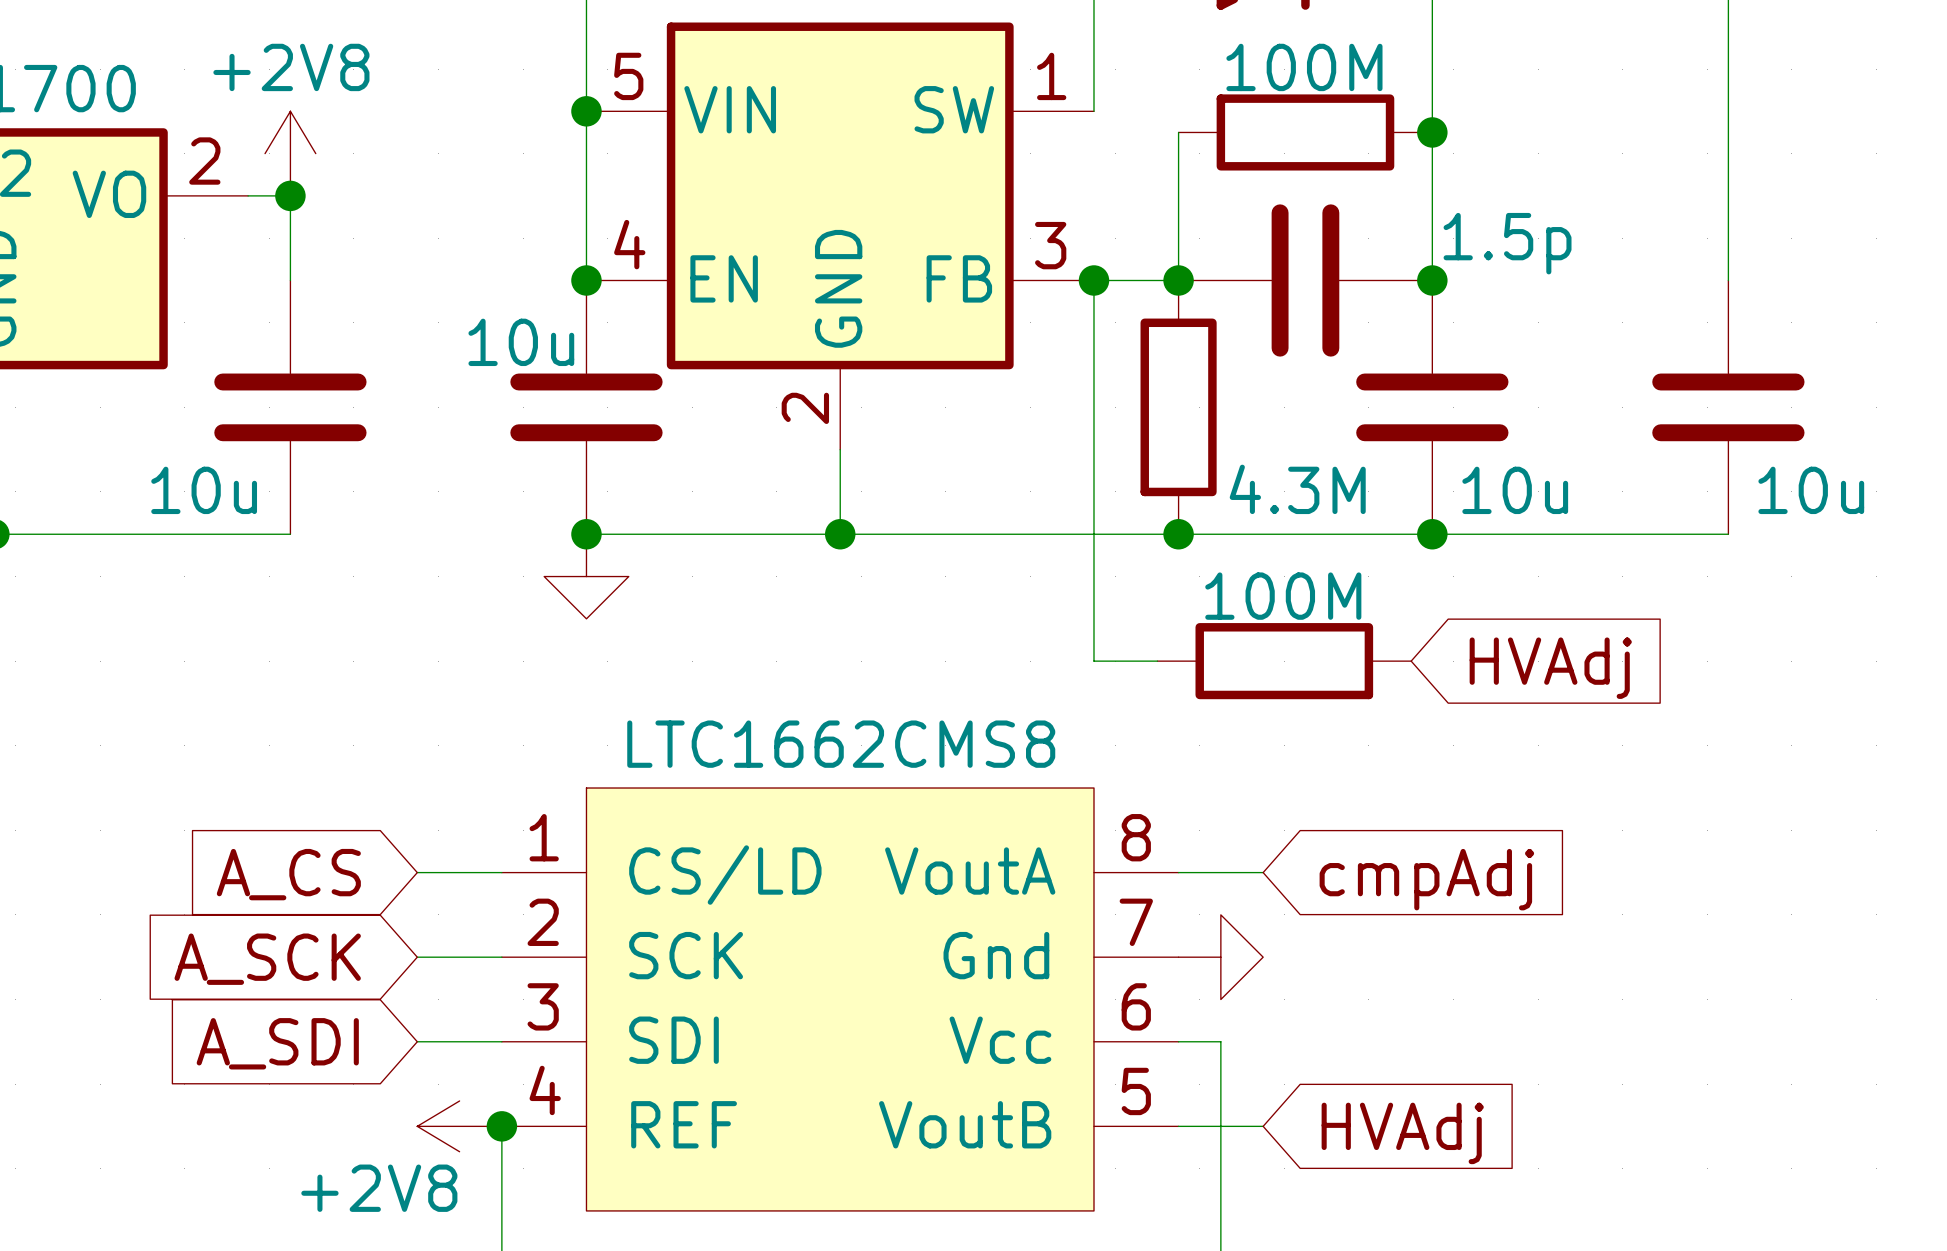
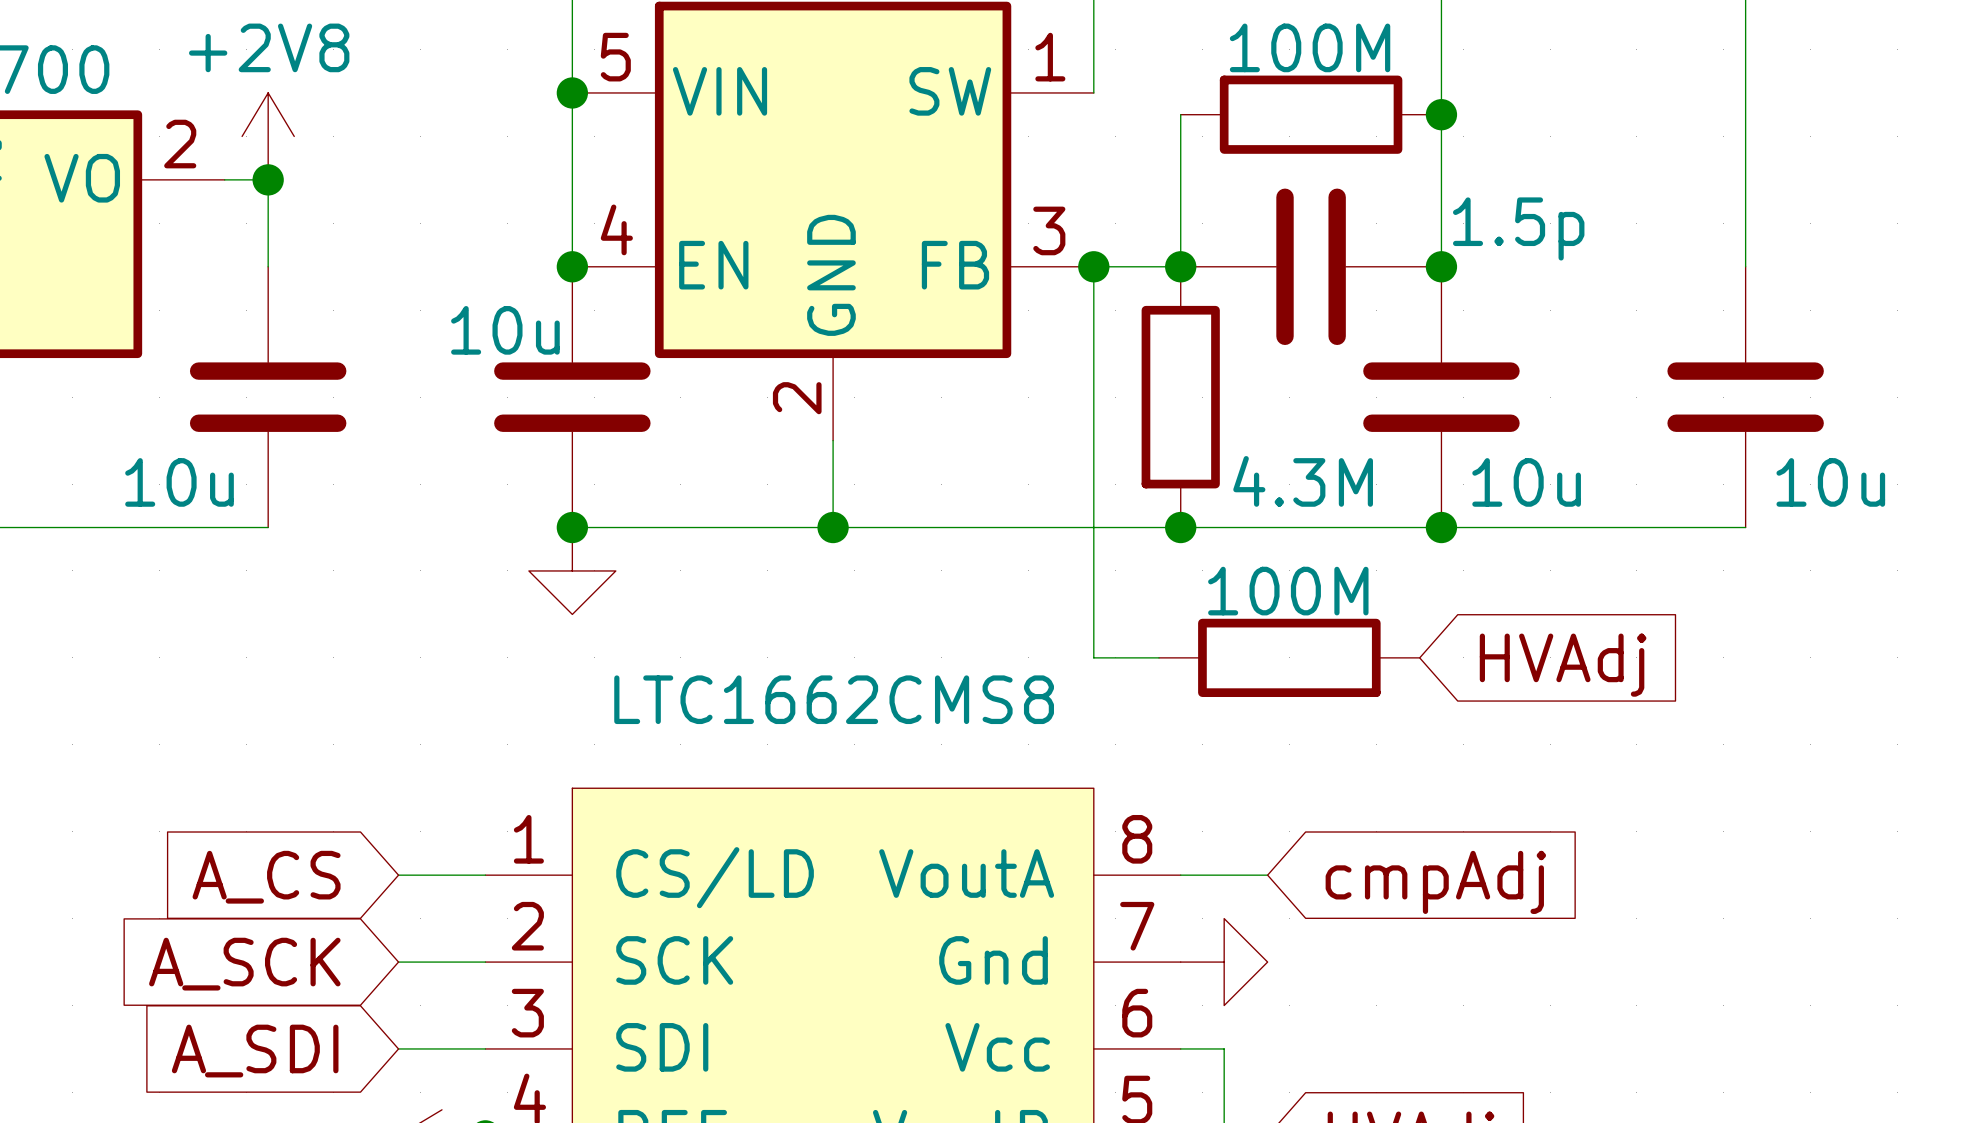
part value position: LTC1662CMS8 (841, 744) -> LTC1662CMS8 (834, 699)

